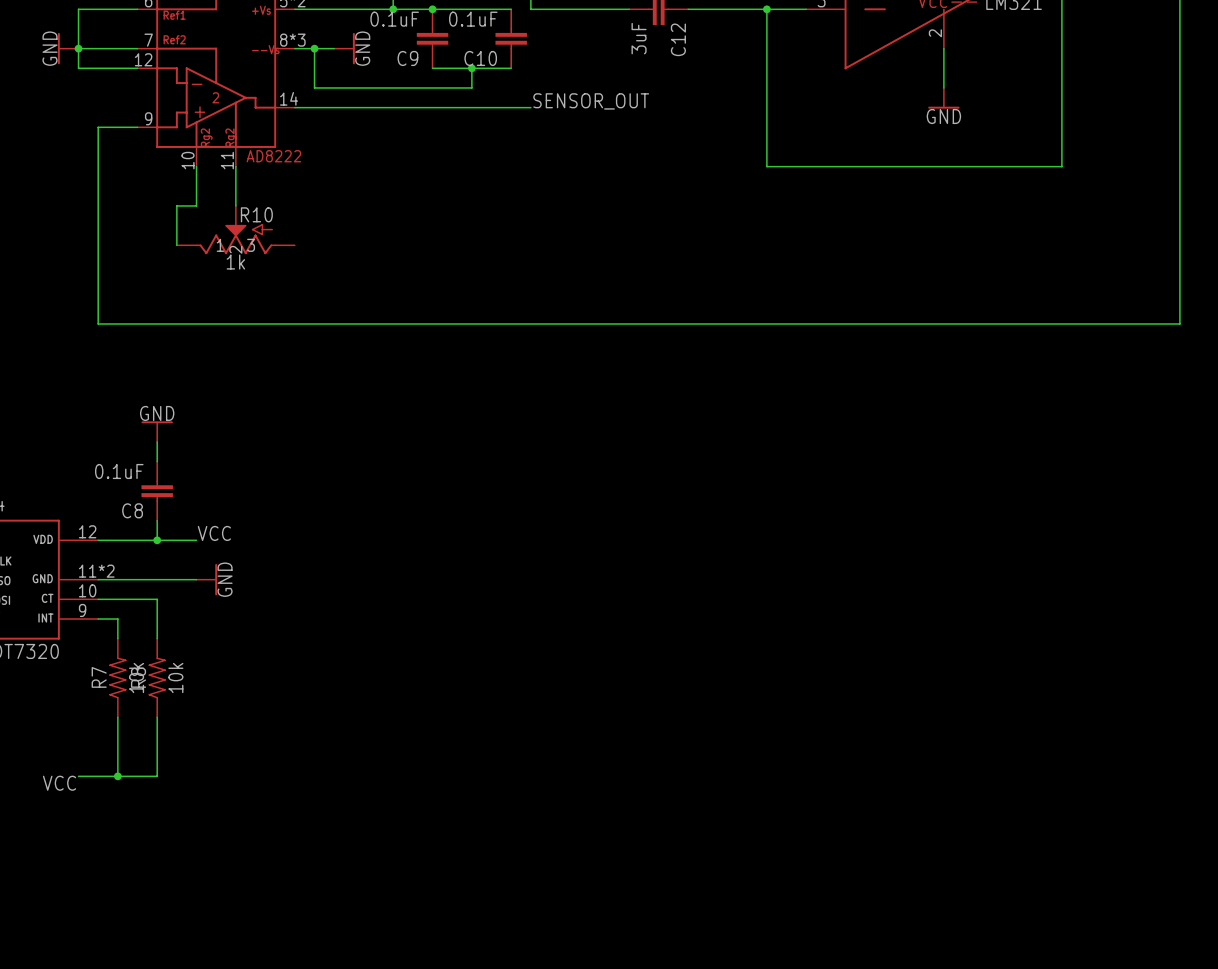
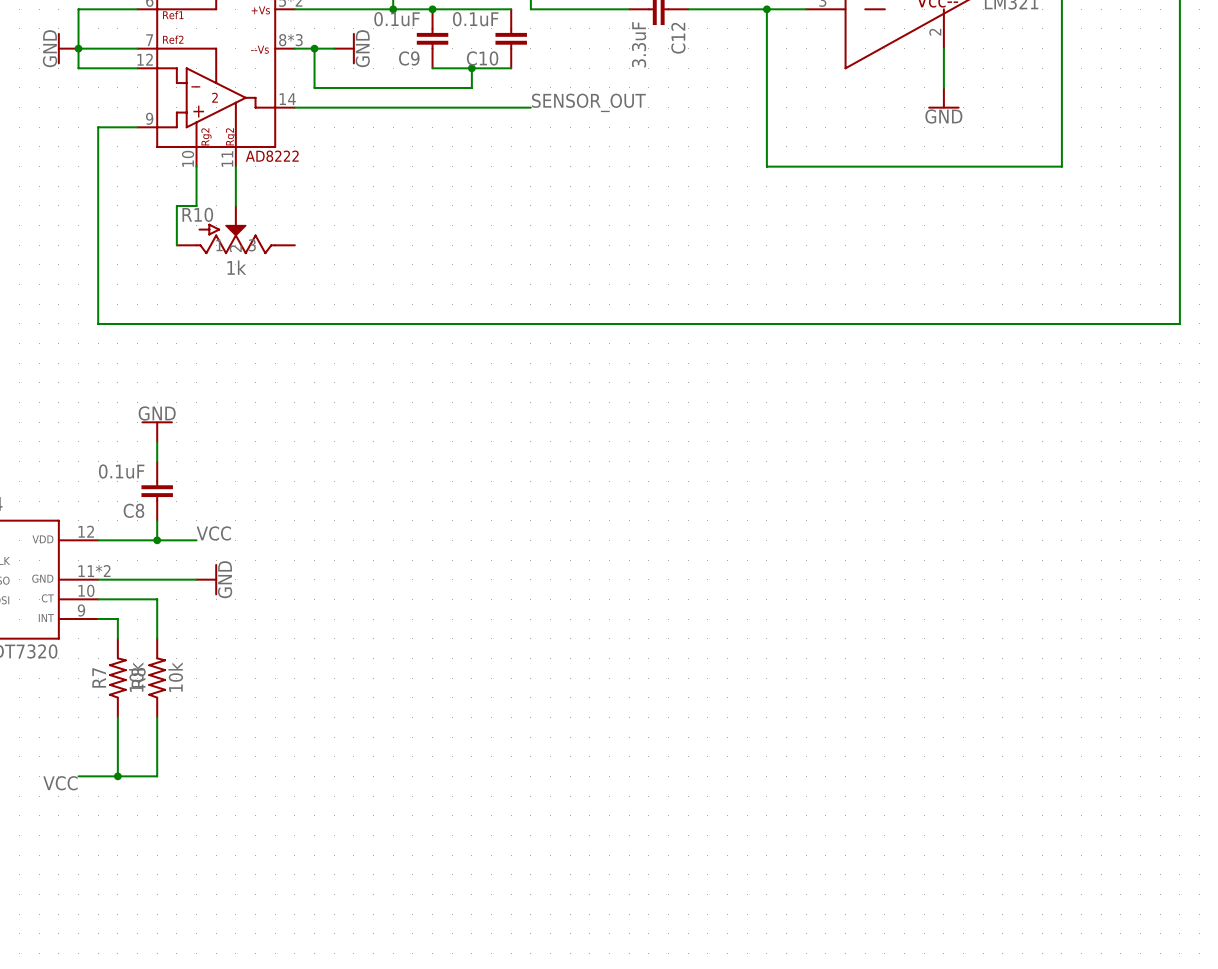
C12 value: 3uF (639, 38) -> 3.3uF (639, 44)
R10 symbol: [176, 205, 295, 255] -> [176, 205, 295, 255]
R10 name position: R10 (256, 214) -> R10 (197, 214)

